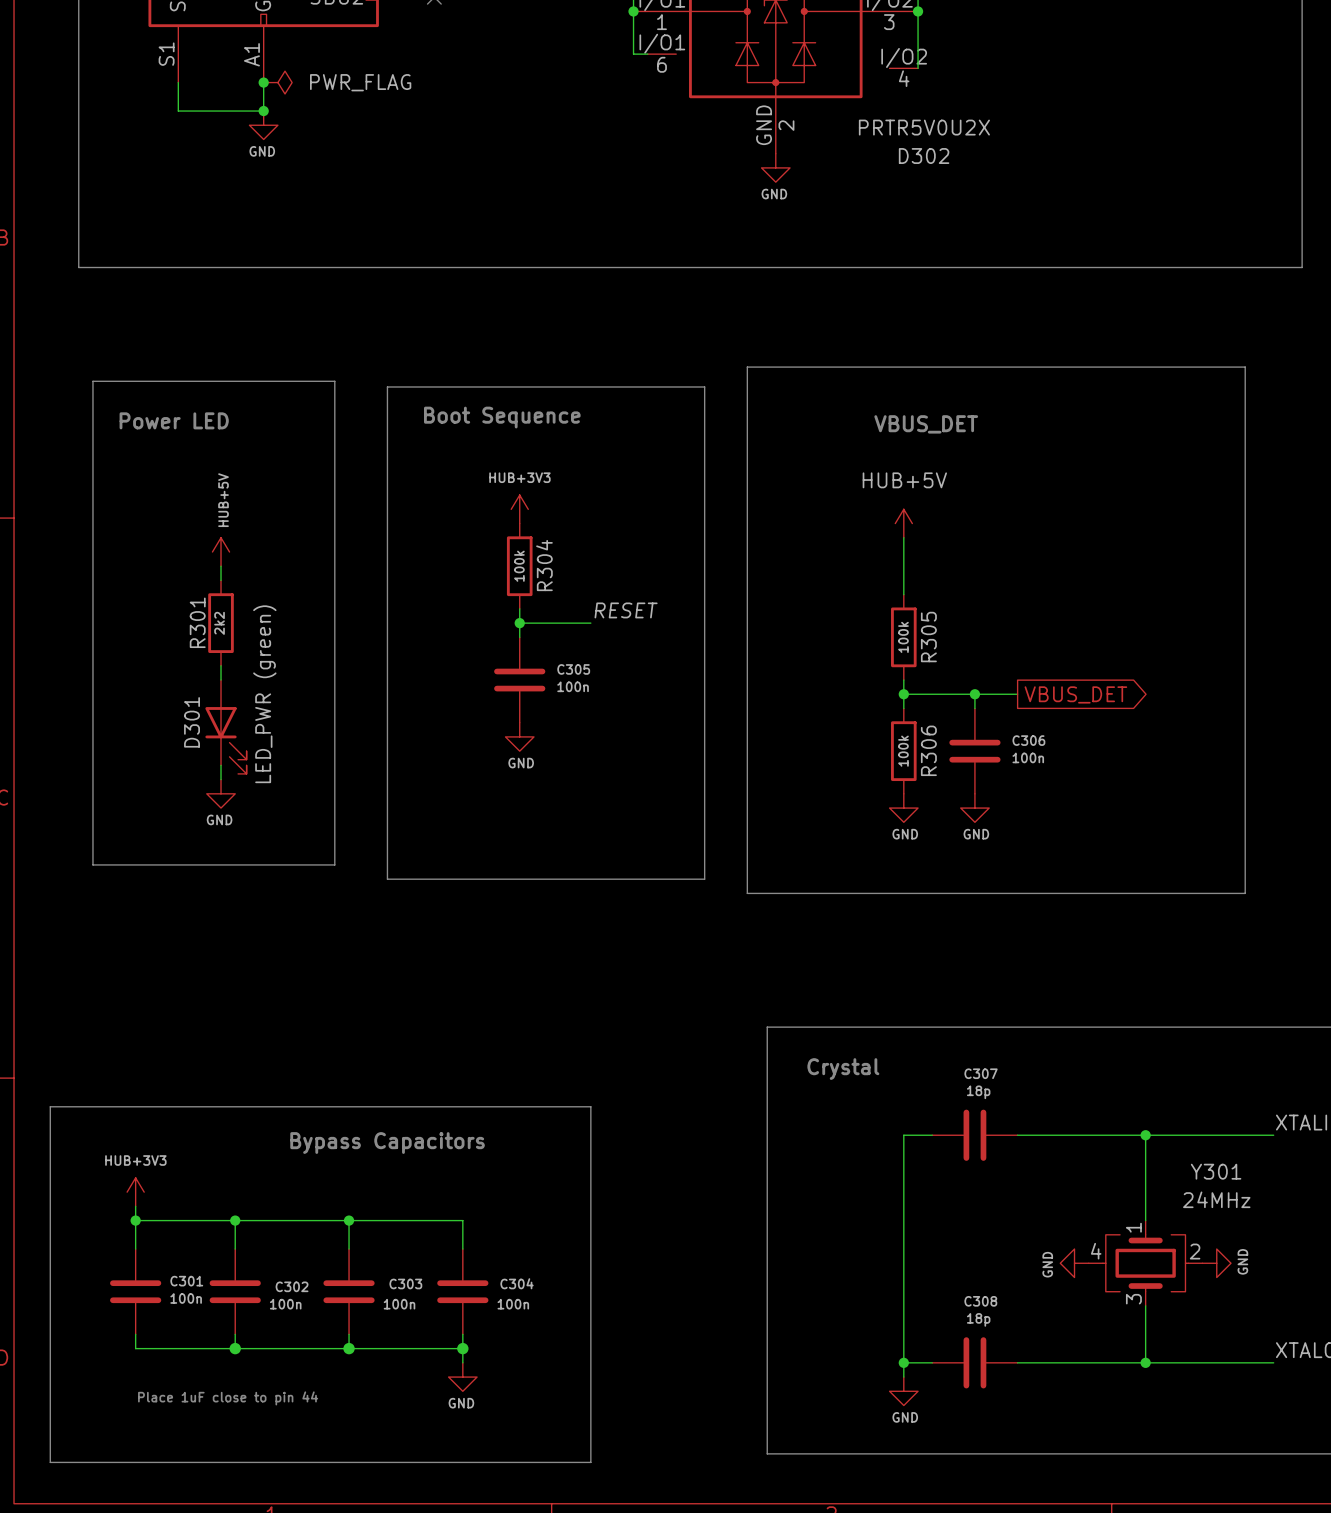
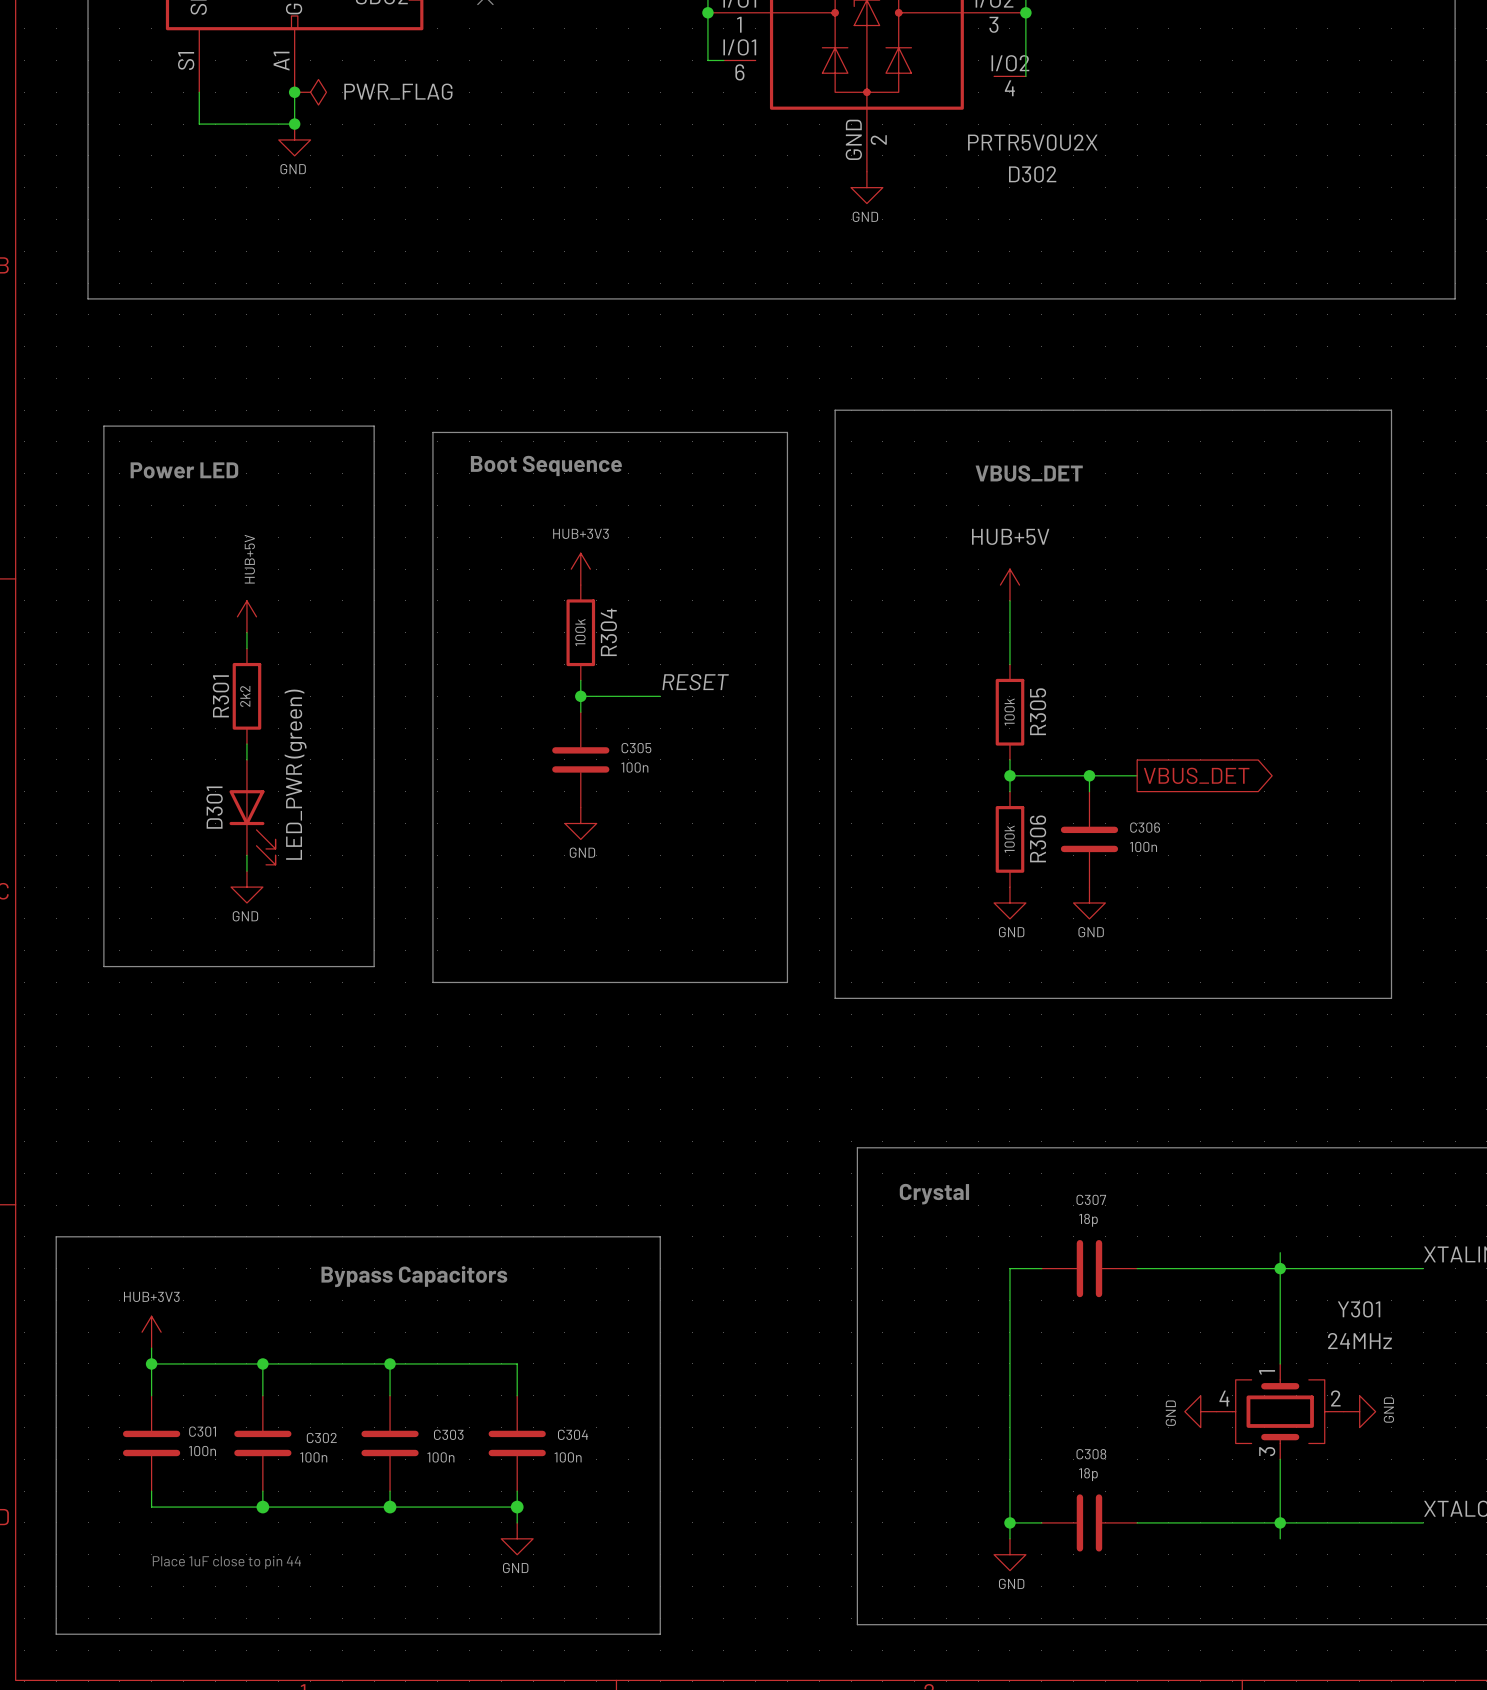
wire: none -> (1280, 1252) (1280, 1268)
wire: none -> (1280, 1522) (1280, 1538)

